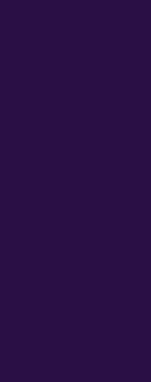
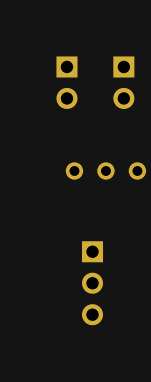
part: none -> (66, 82)
part: none -> (123, 82)
part: none -> (105, 170)
part: none -> (92, 283)

